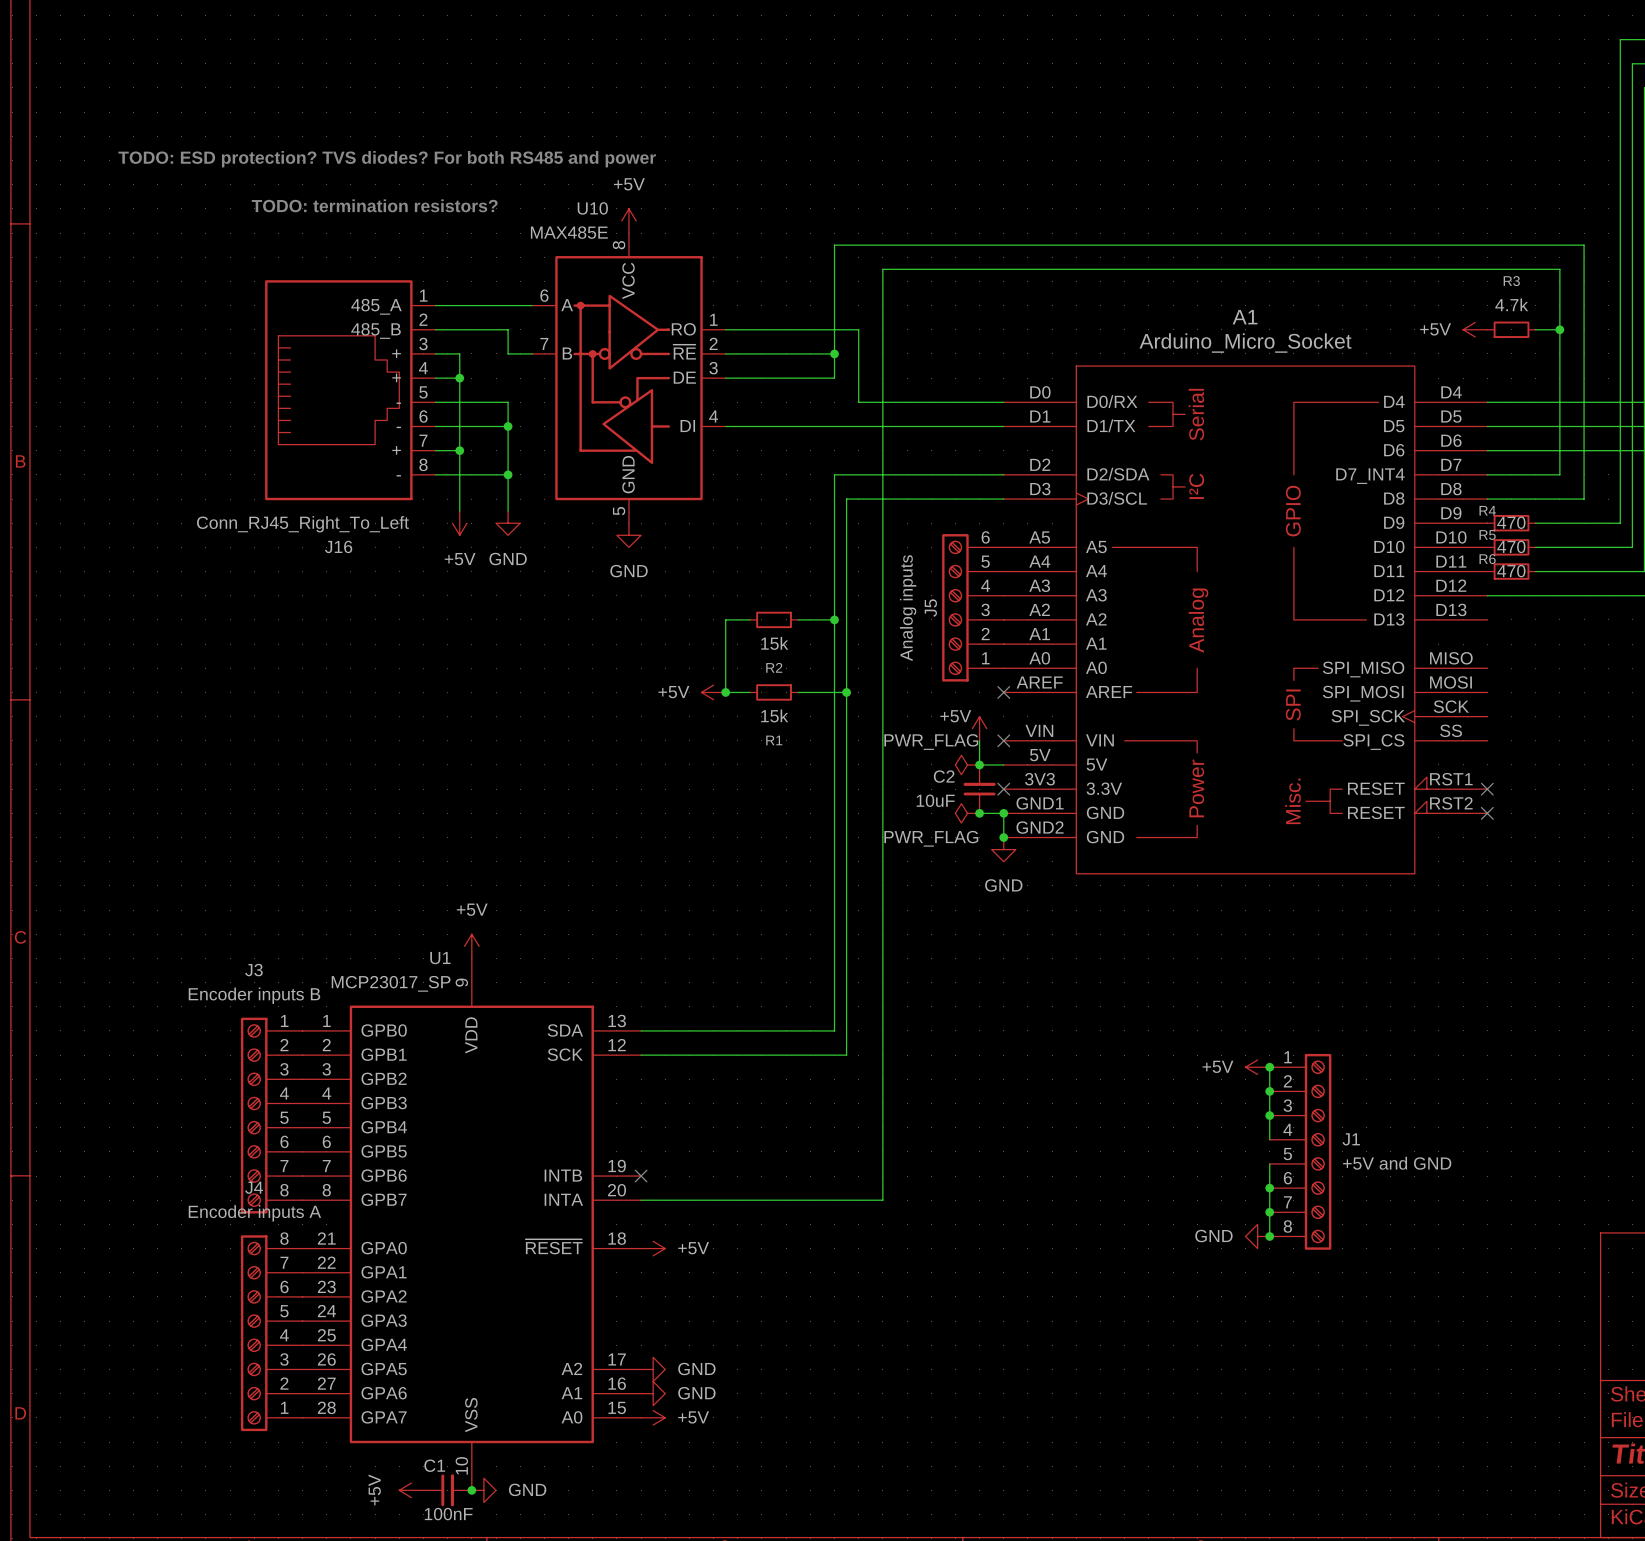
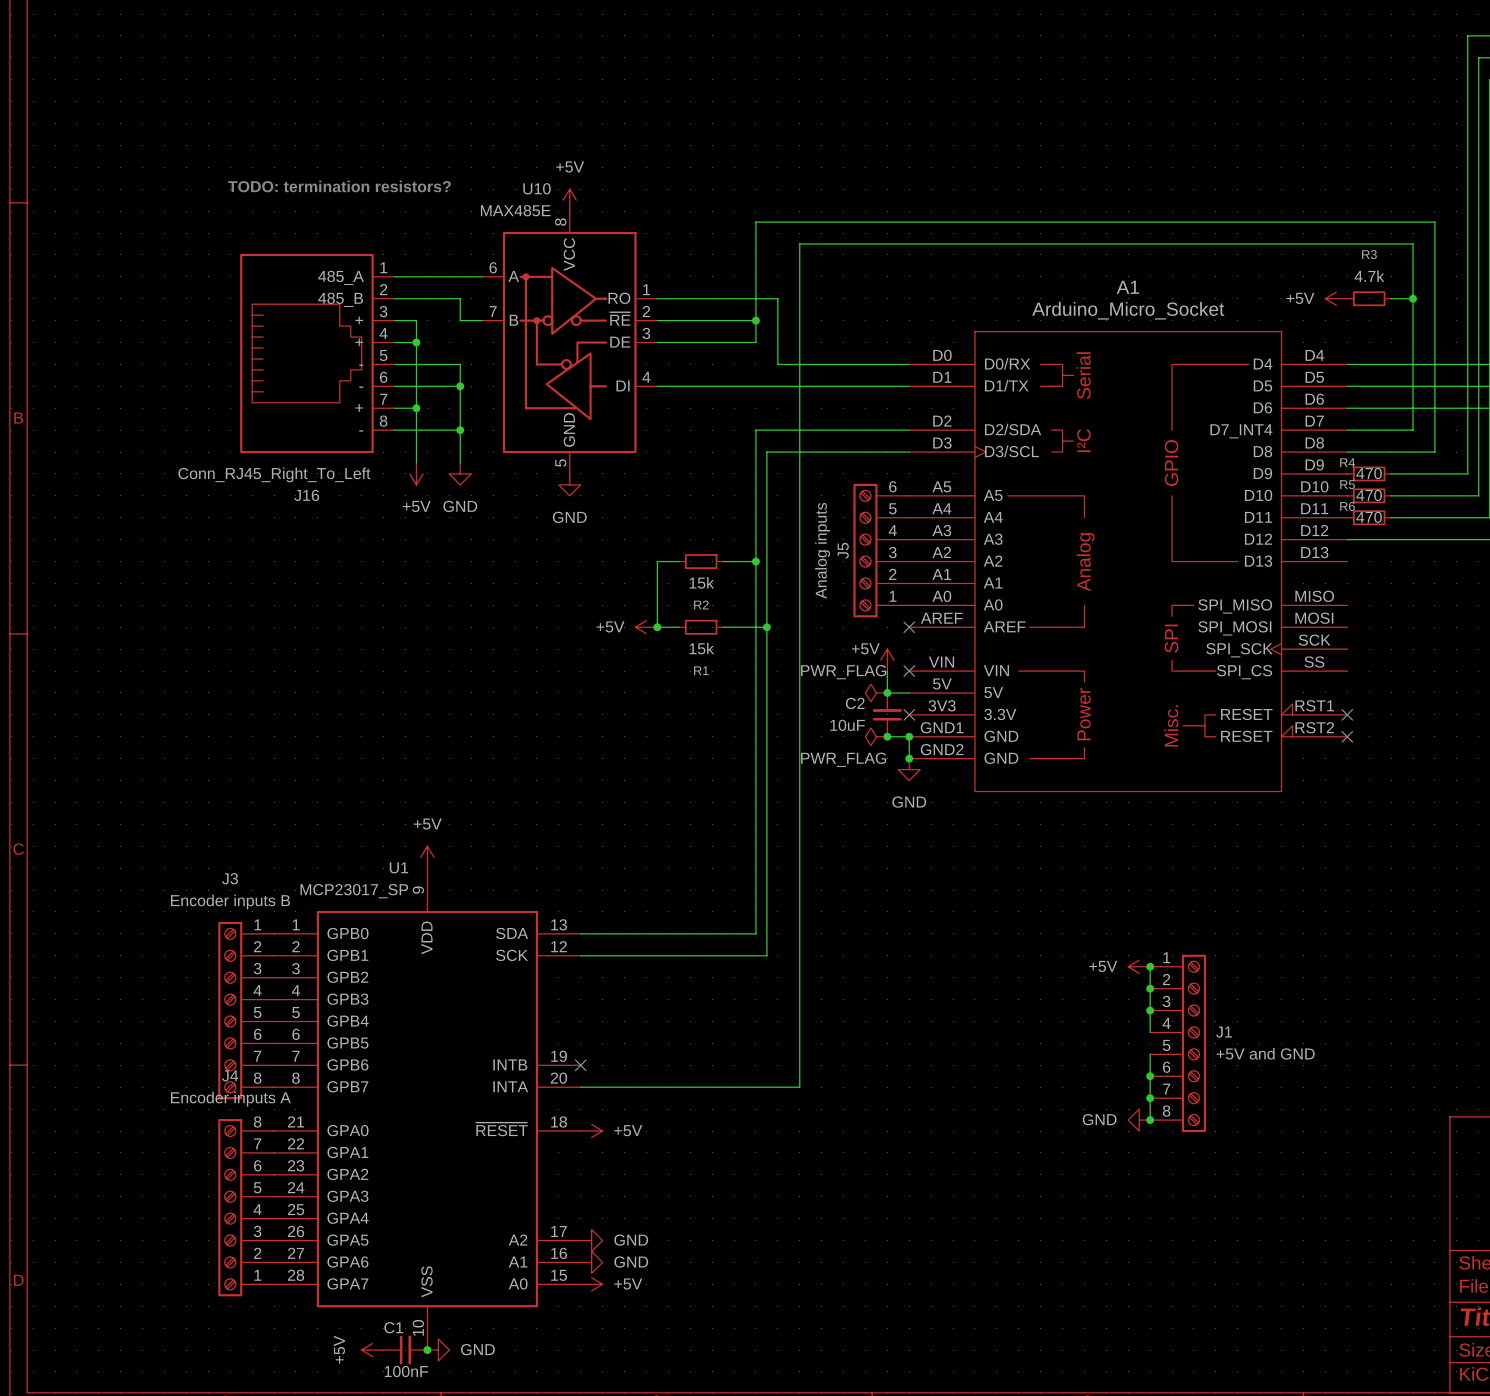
text: TODO: ESD protection? TVS diodes? For both RS485 and power (387, 159) -> none

